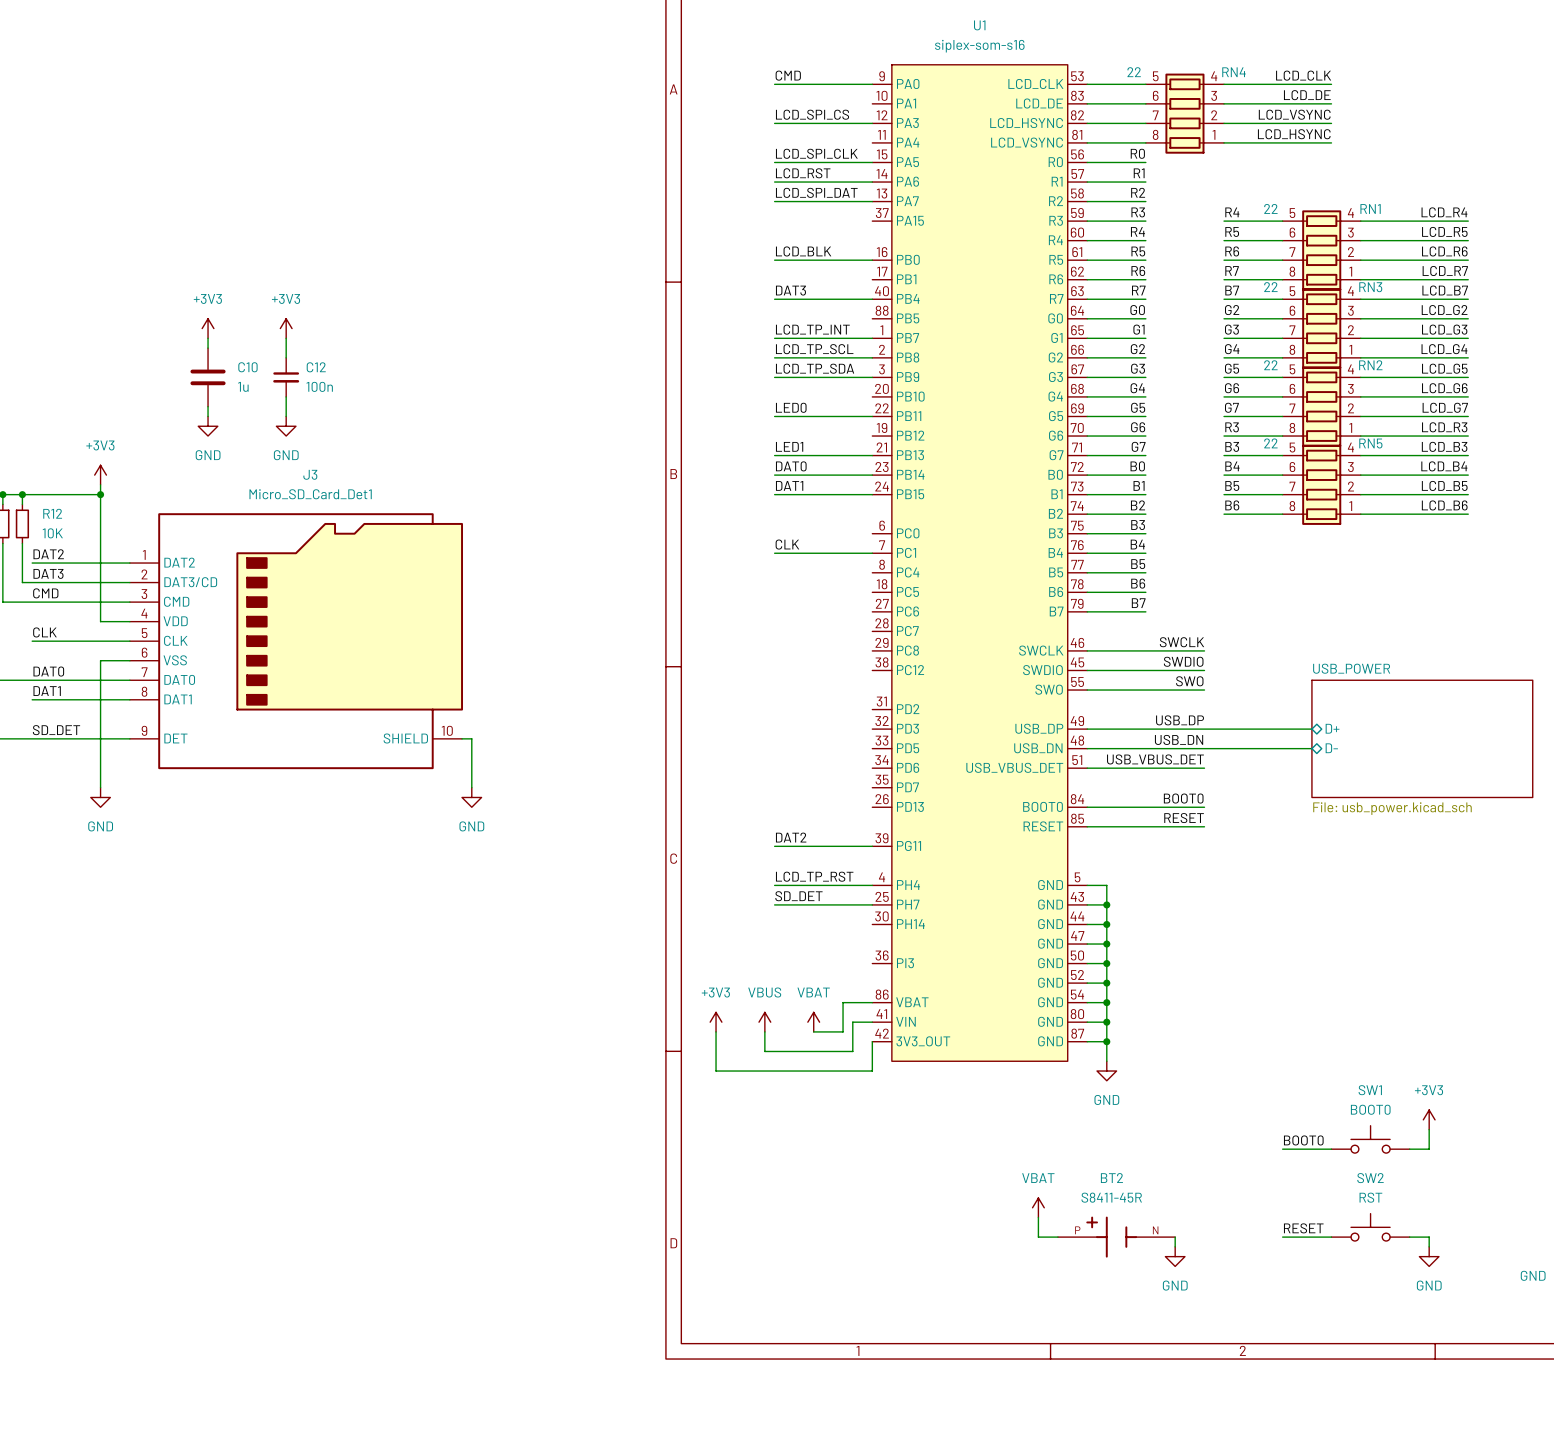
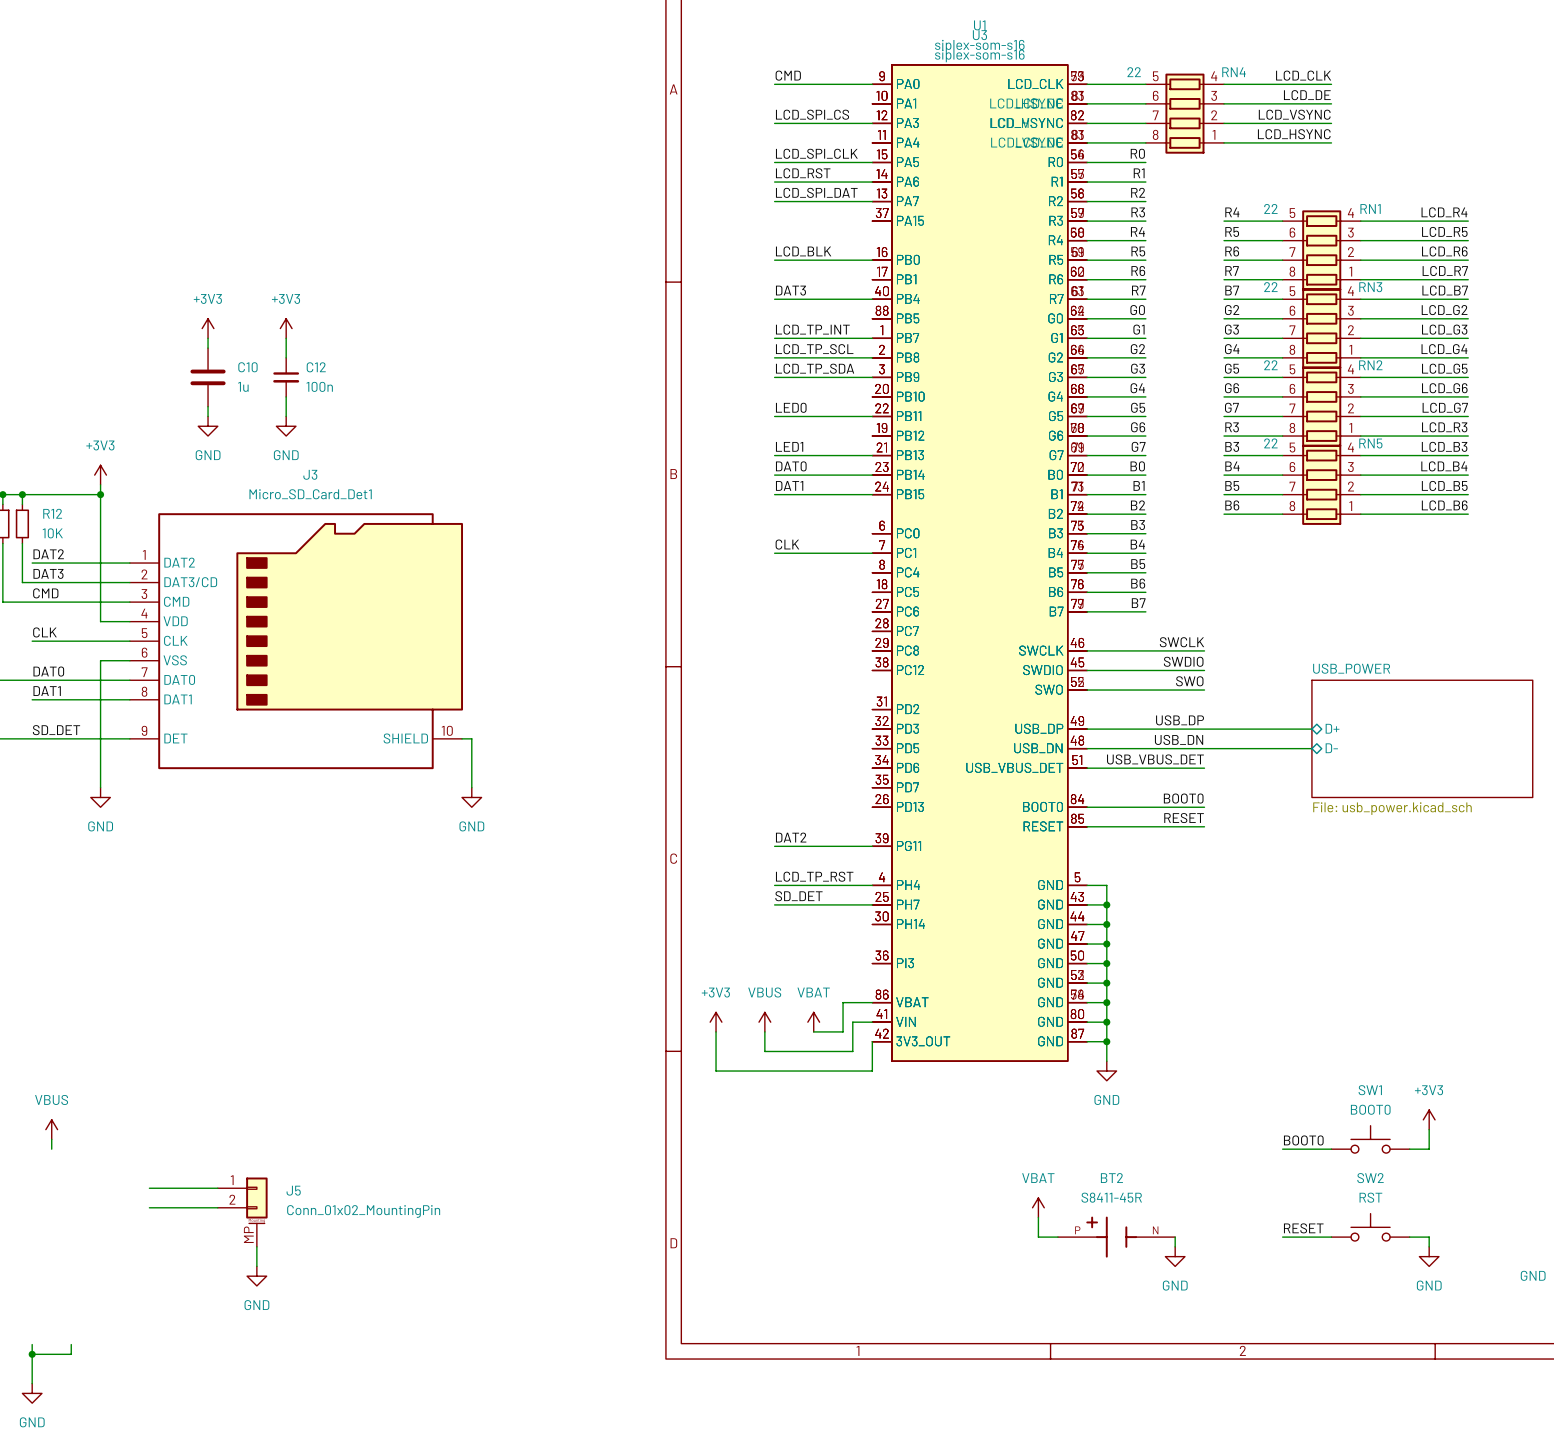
U3: none -> siplex-som-s16 (979, 563)
power symbol: none -> VBUS (51, 1129)
wire: none -> (51, 1139) (51, 1149)
wire: none -> (149, 1188) (217, 1188)
wire: none -> (149, 1207) (217, 1207)
J5: none -> Conn_01x02_MountingPin (242, 1212)
wire: none -> (256, 1246) (256, 1266)
power symbol: none -> GND (256, 1276)
wire: none -> (32, 1344) (32, 1383)
wire: none -> (71, 1344) (71, 1354) (32, 1354)
junction: none -> (32, 1354)
power symbol: none -> GND (32, 1393)

